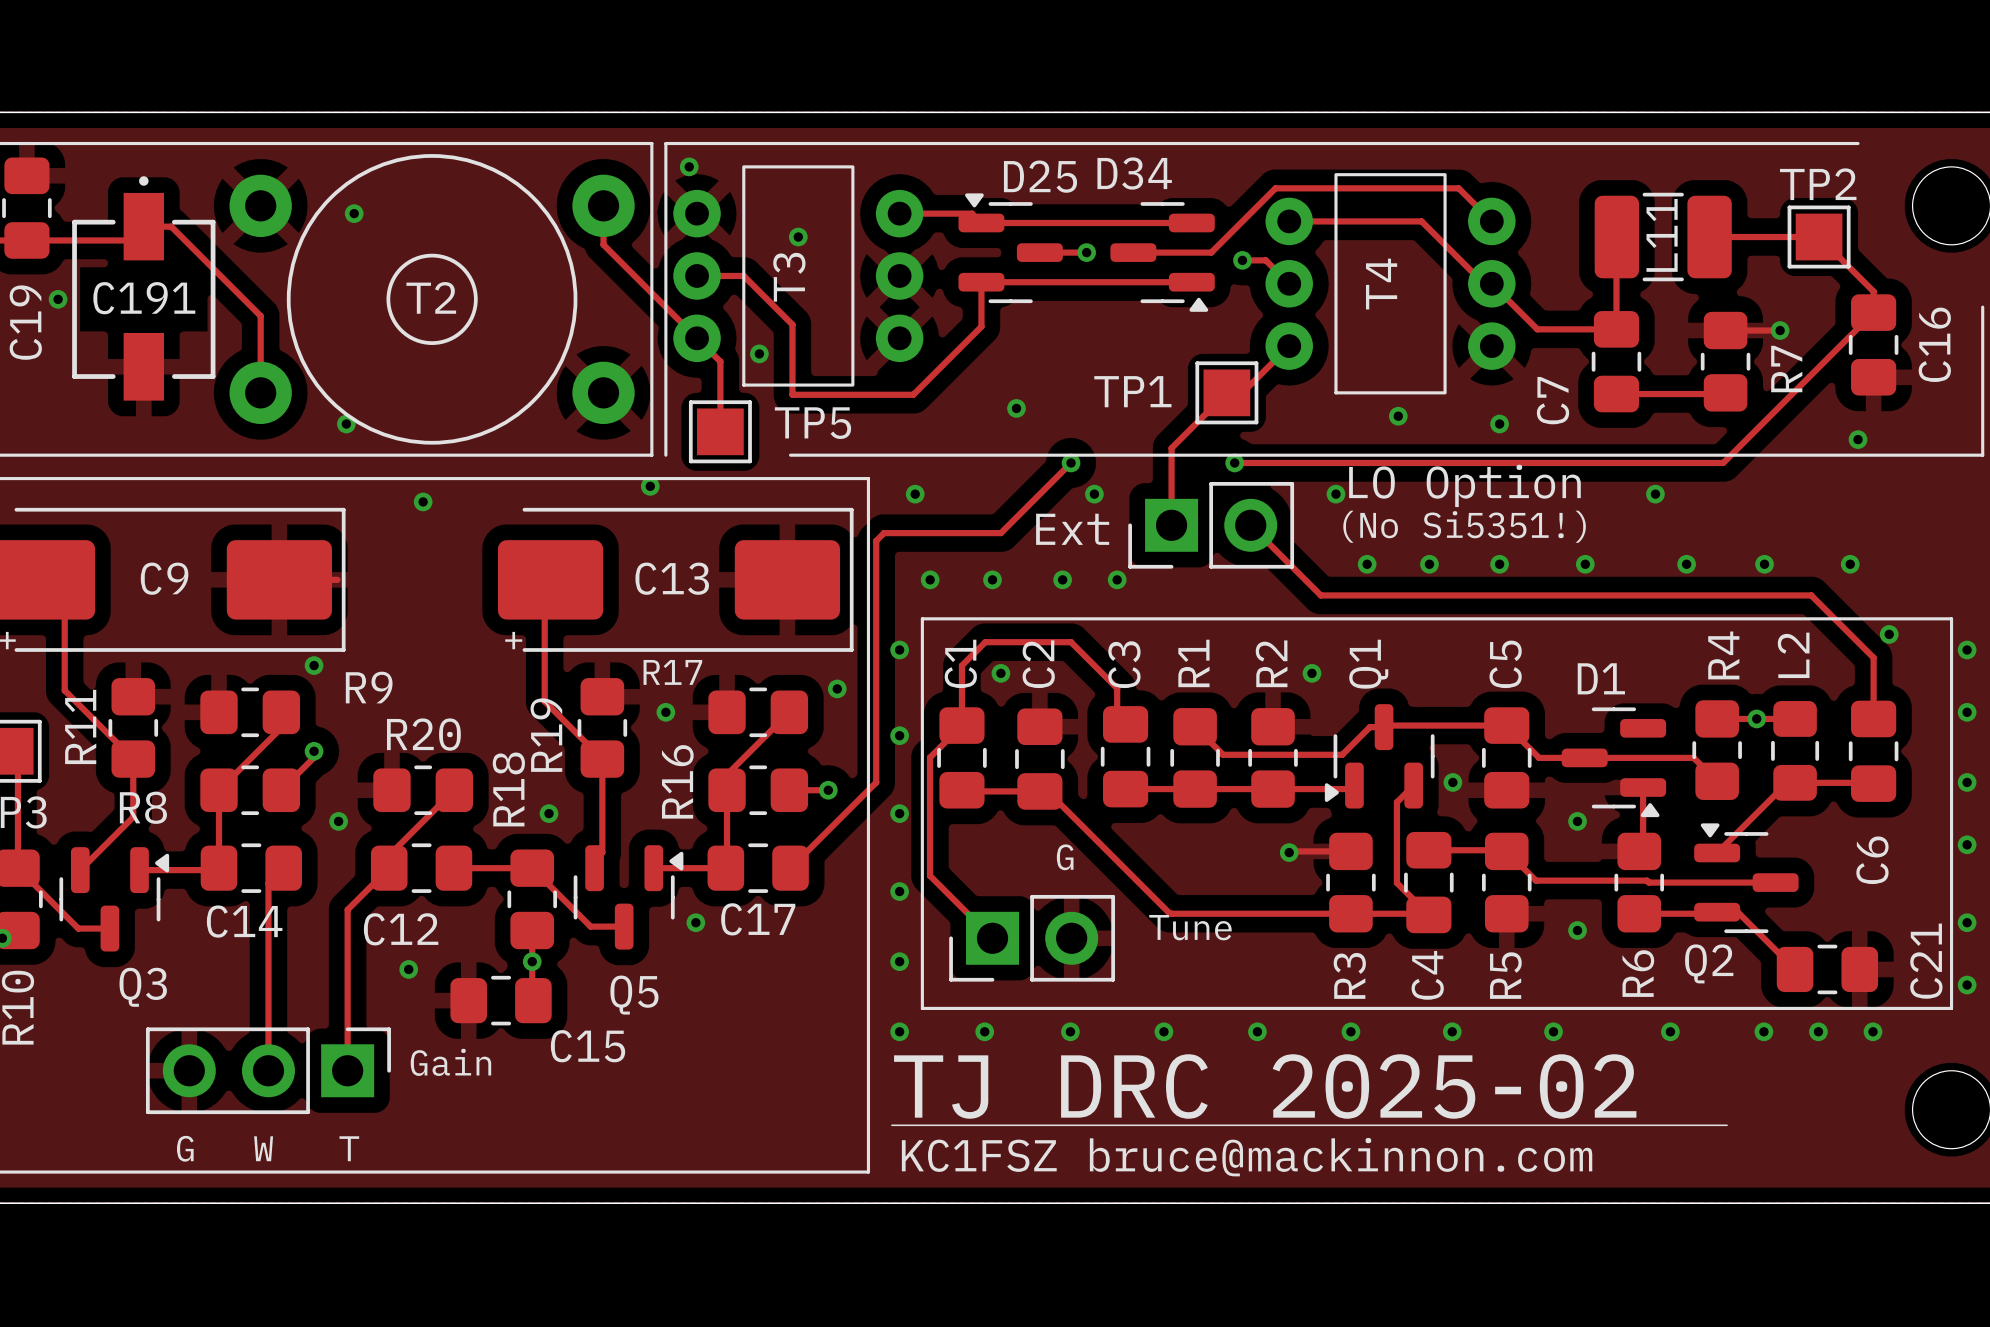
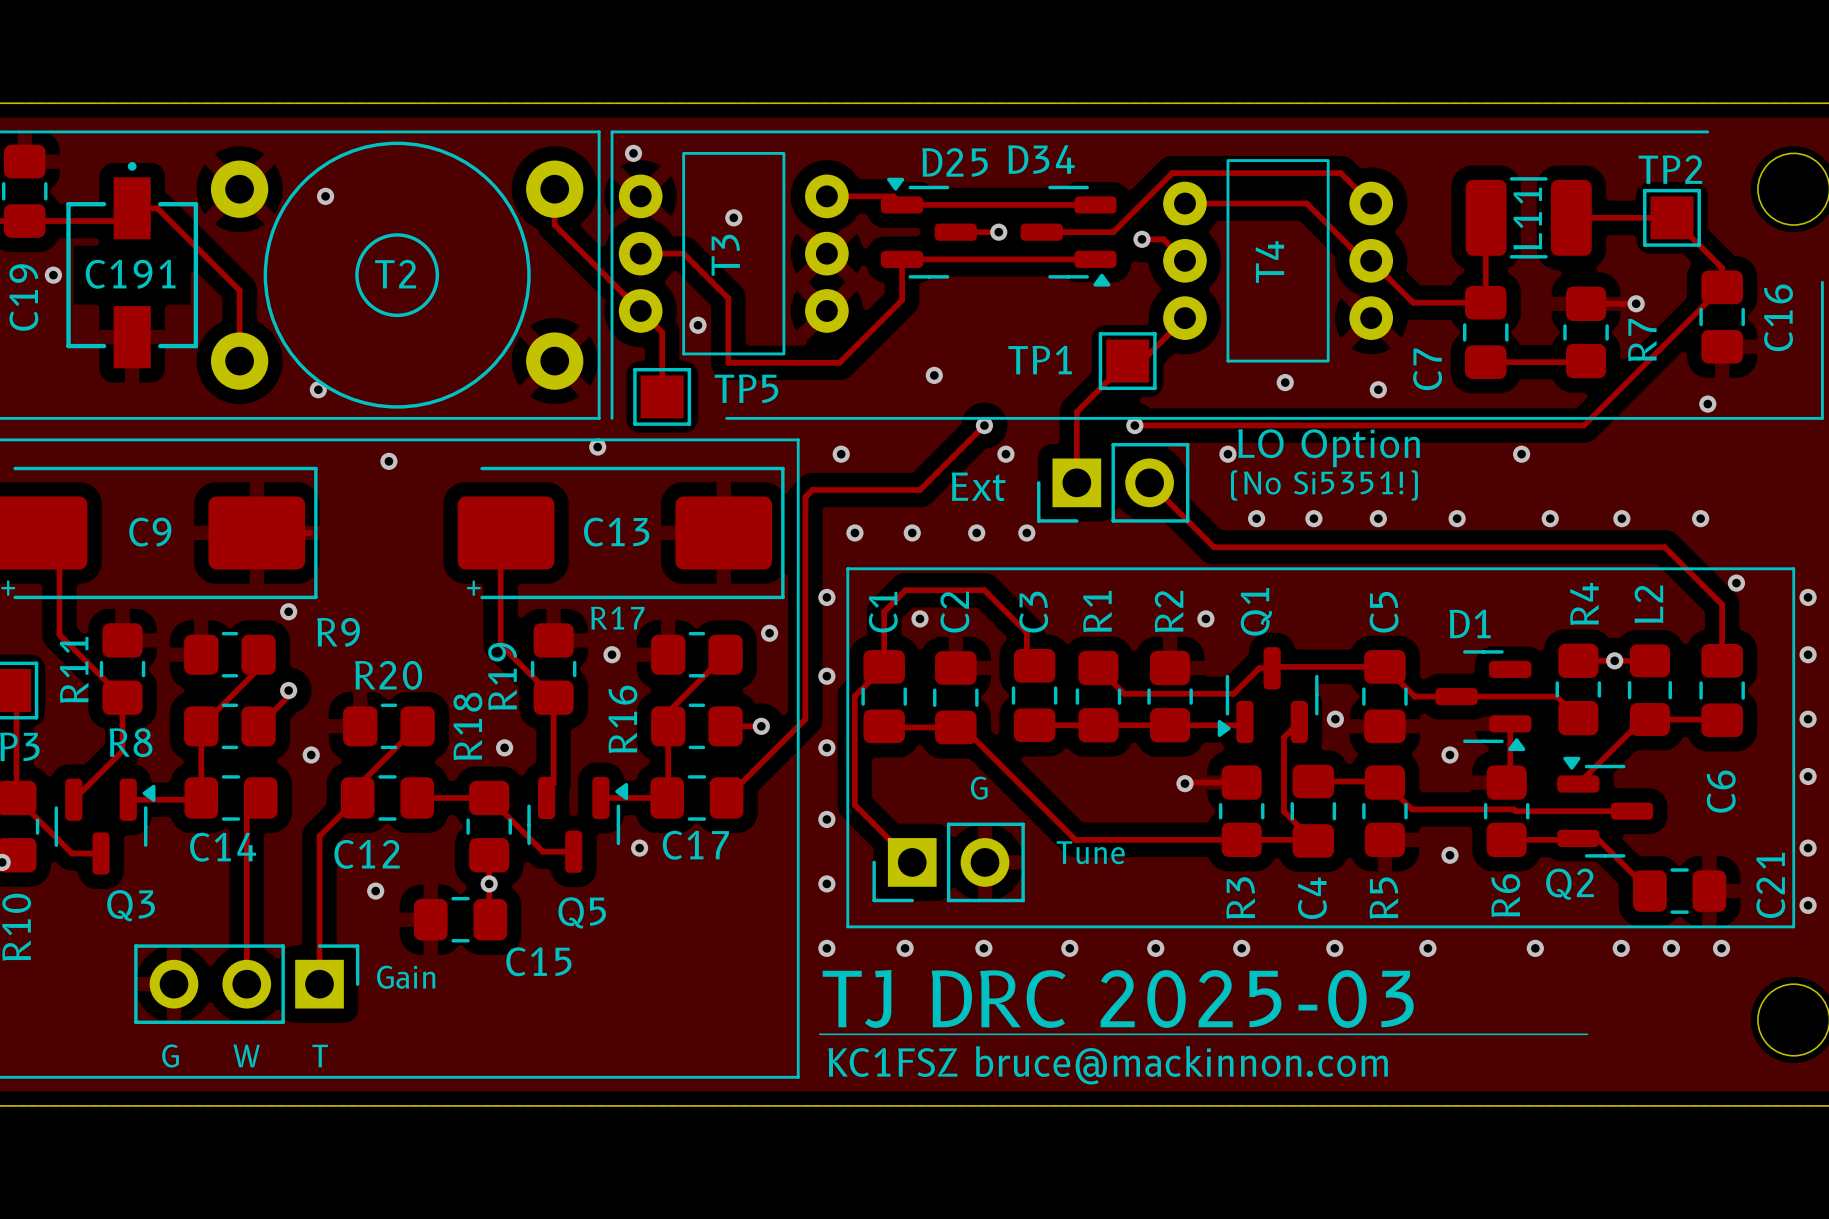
text: TJ DRC 2025-02 (1265, 1086) -> TJ DRC 2025-03 (1118, 998)

